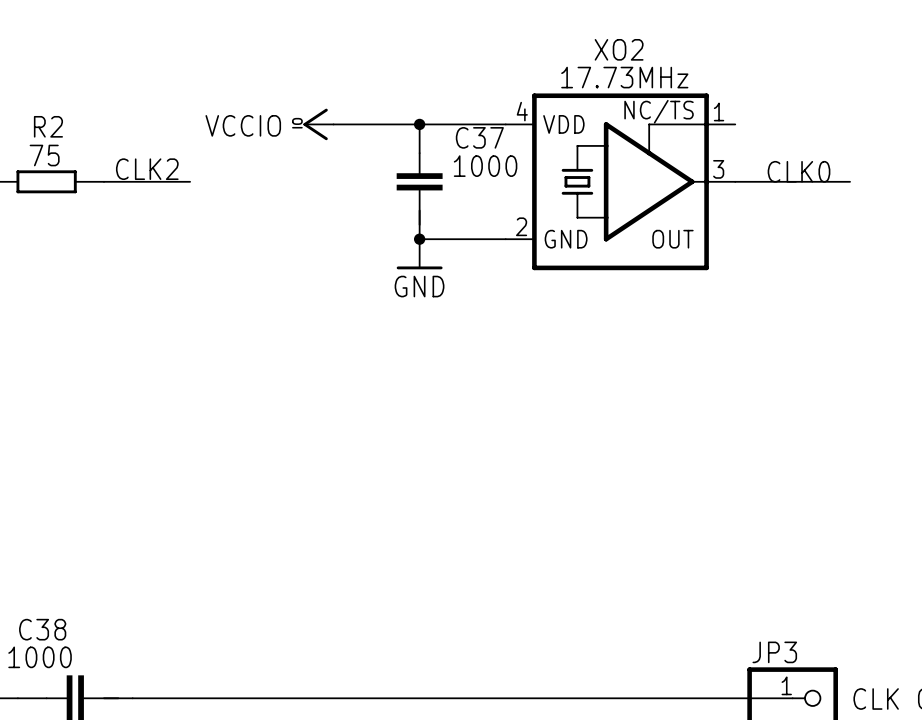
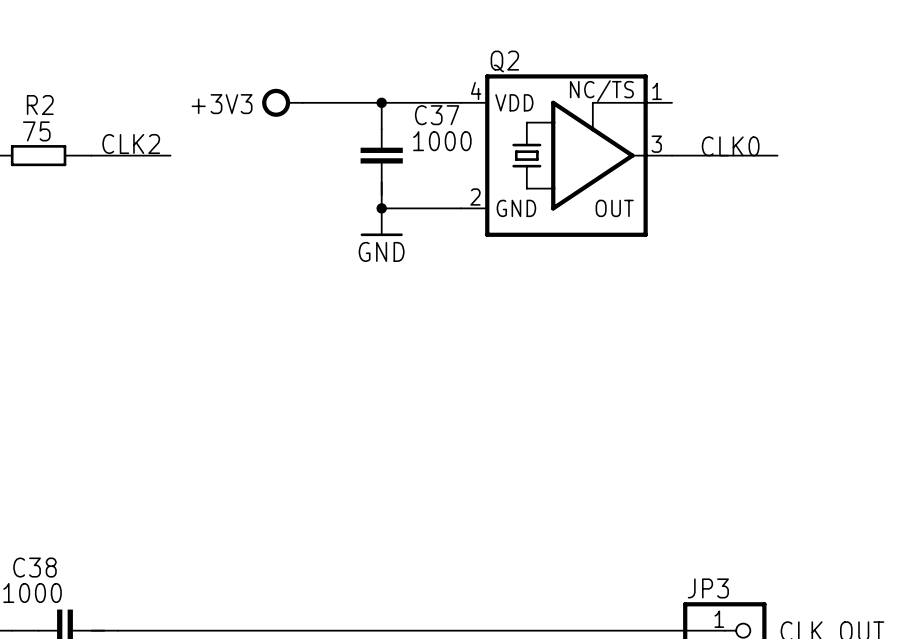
XO2 name: XO2 (619, 49) -> Q2 (504, 61)
XO2 value: 17.73MHz (624, 77) -> none
power symbol: VCCIO (318, 124) -> +3V3 (282, 102)

